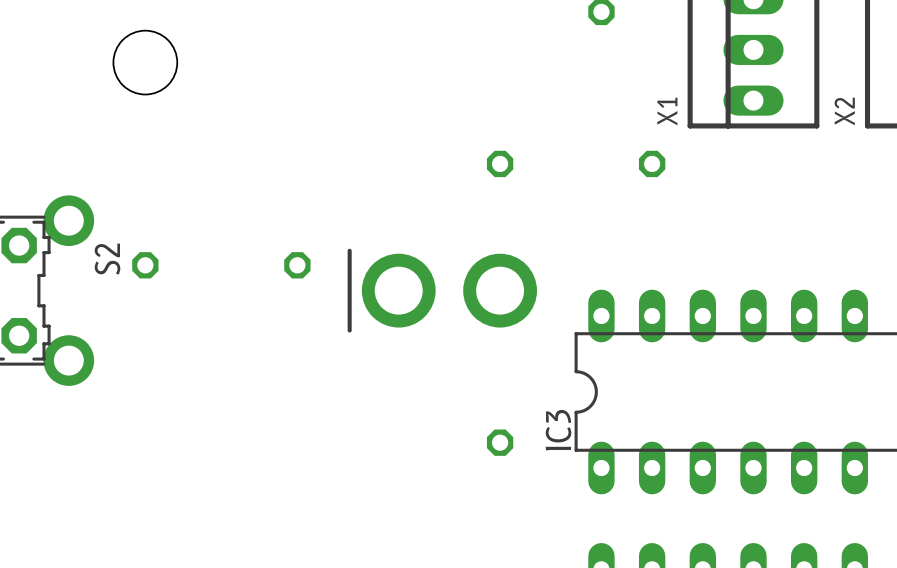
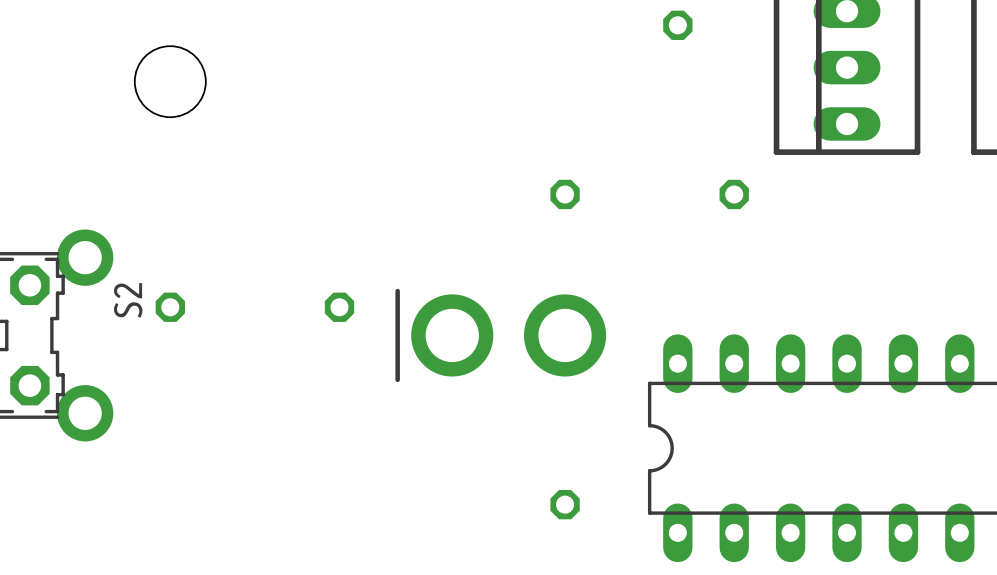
X1 name: X1 (667, 111) -> none
X2 name: X2 (844, 111) -> none
IC3 name: IC3 (558, 430) -> none

